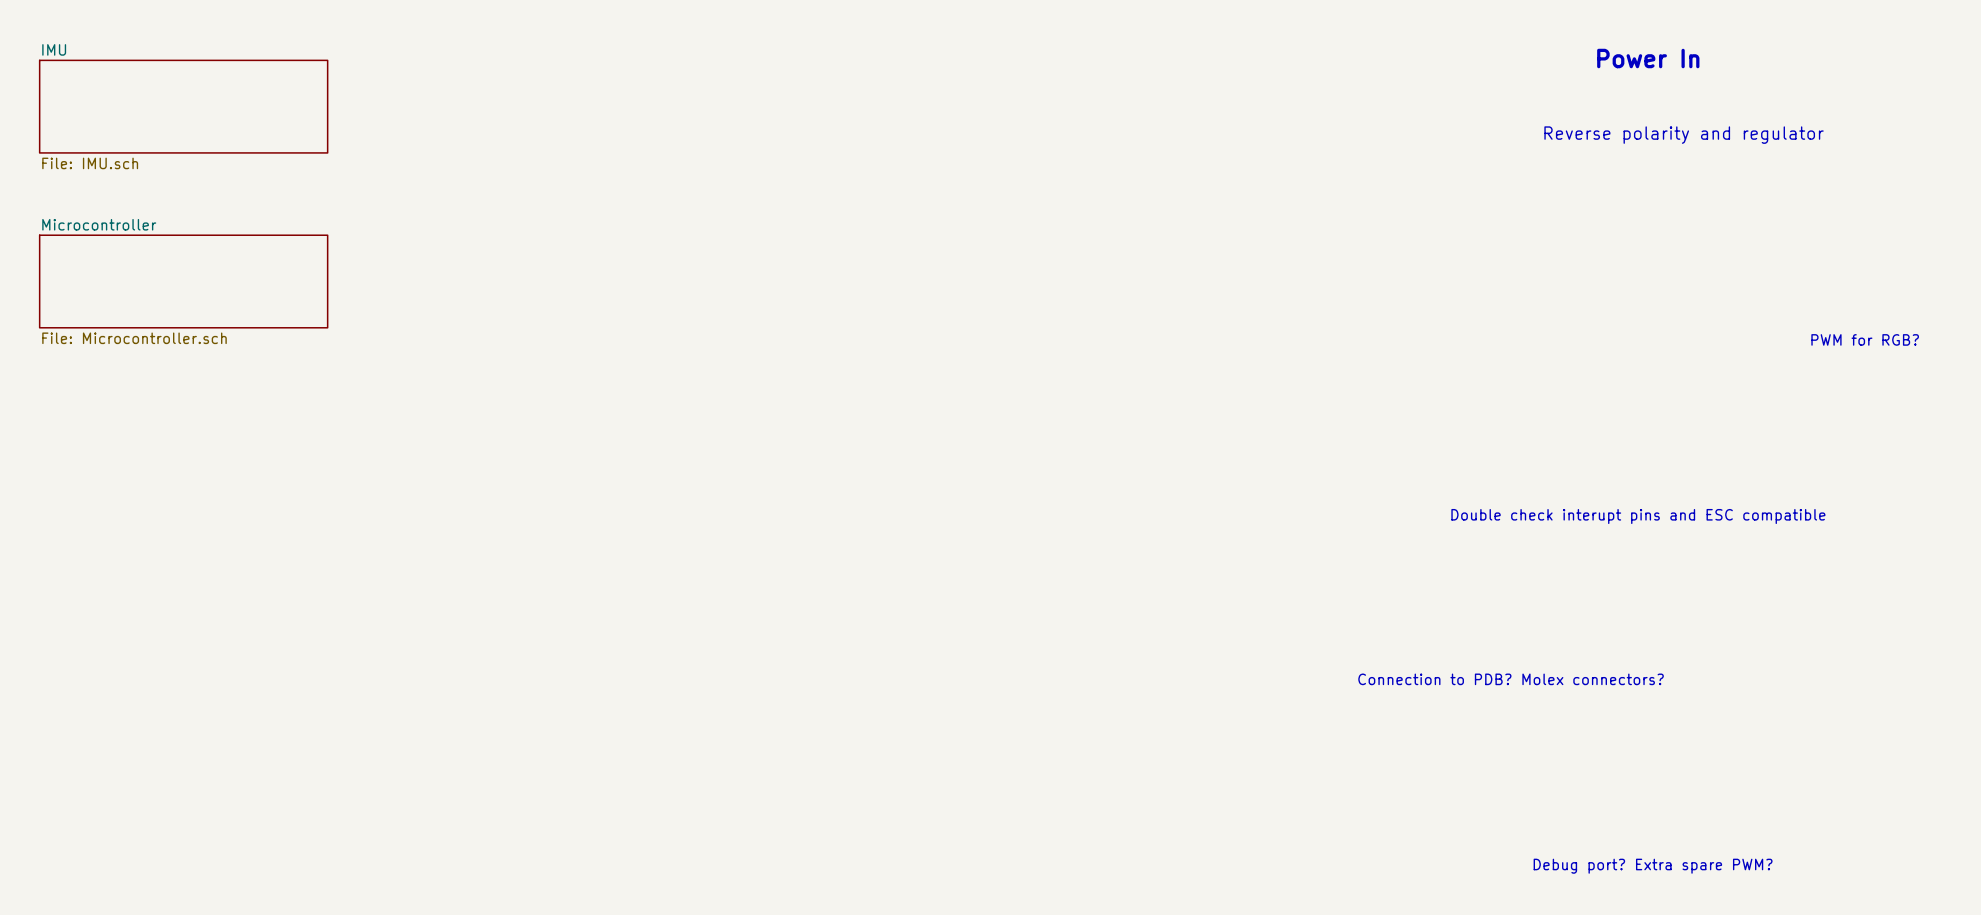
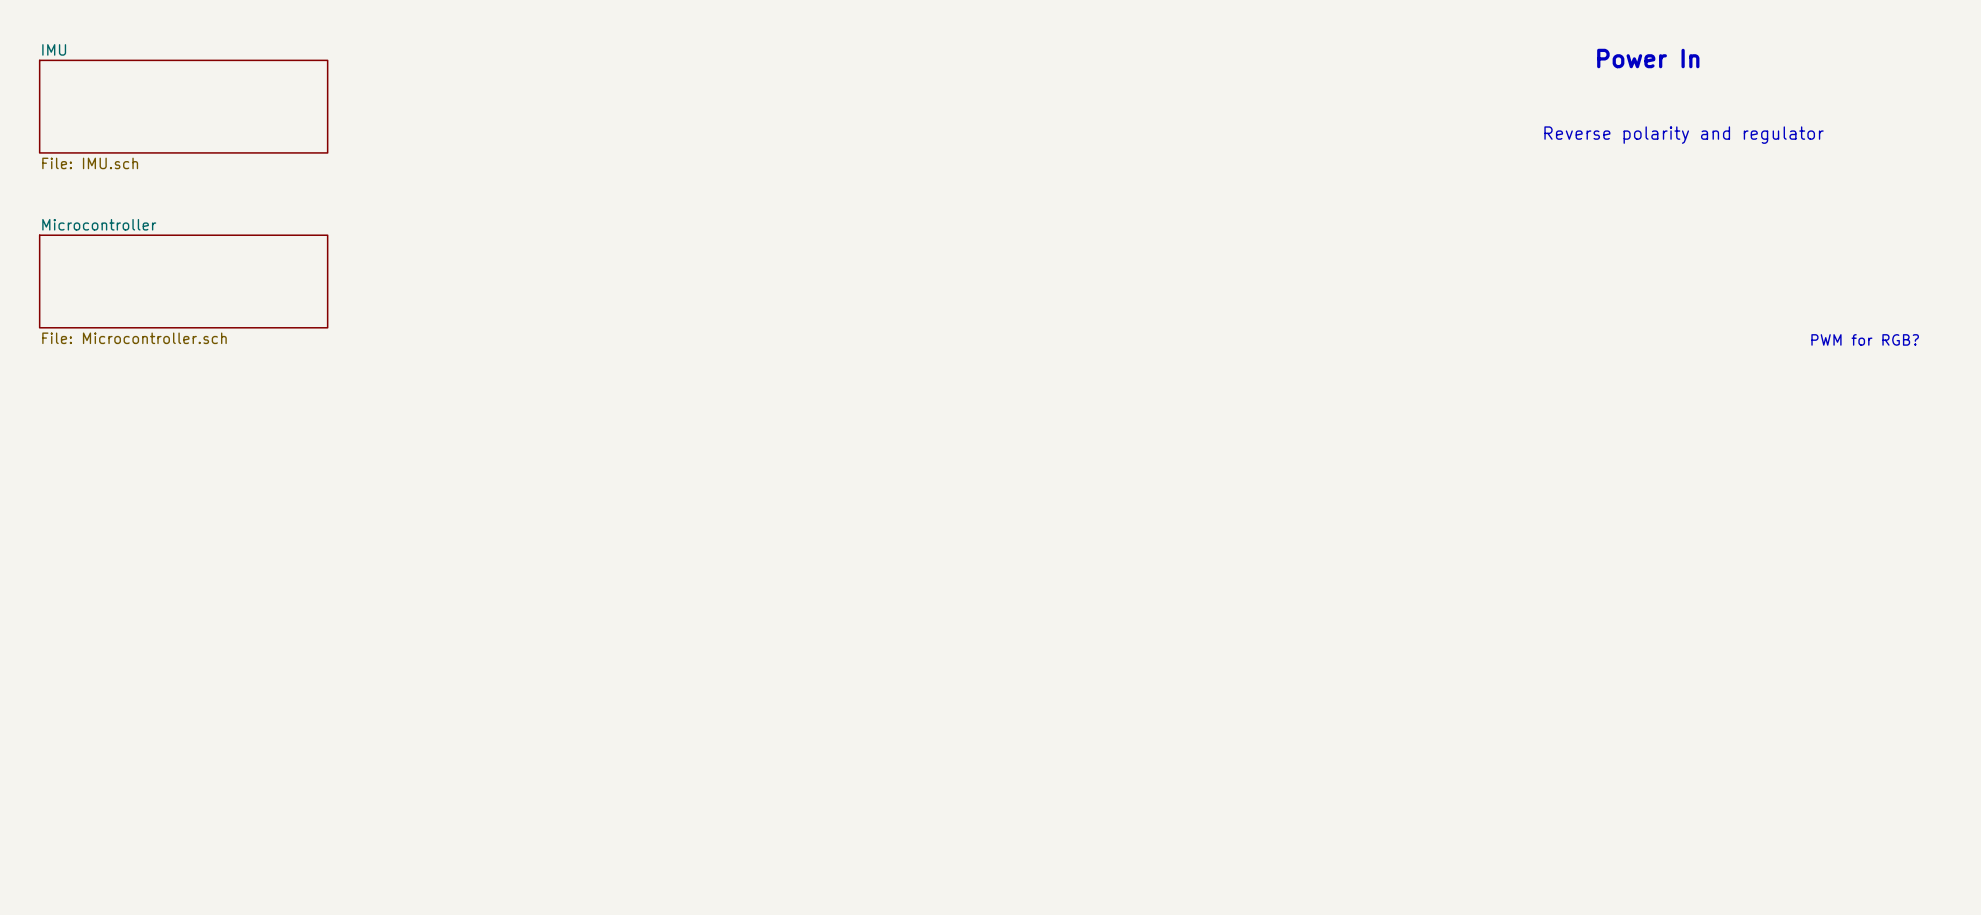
text: Double check interupt pins and ESC compatible (1638, 516) -> none
text: Connection to PDB? Molex connectors? (1511, 679) -> none
text: Debug port? Extra spare PWM? (1653, 866) -> none

